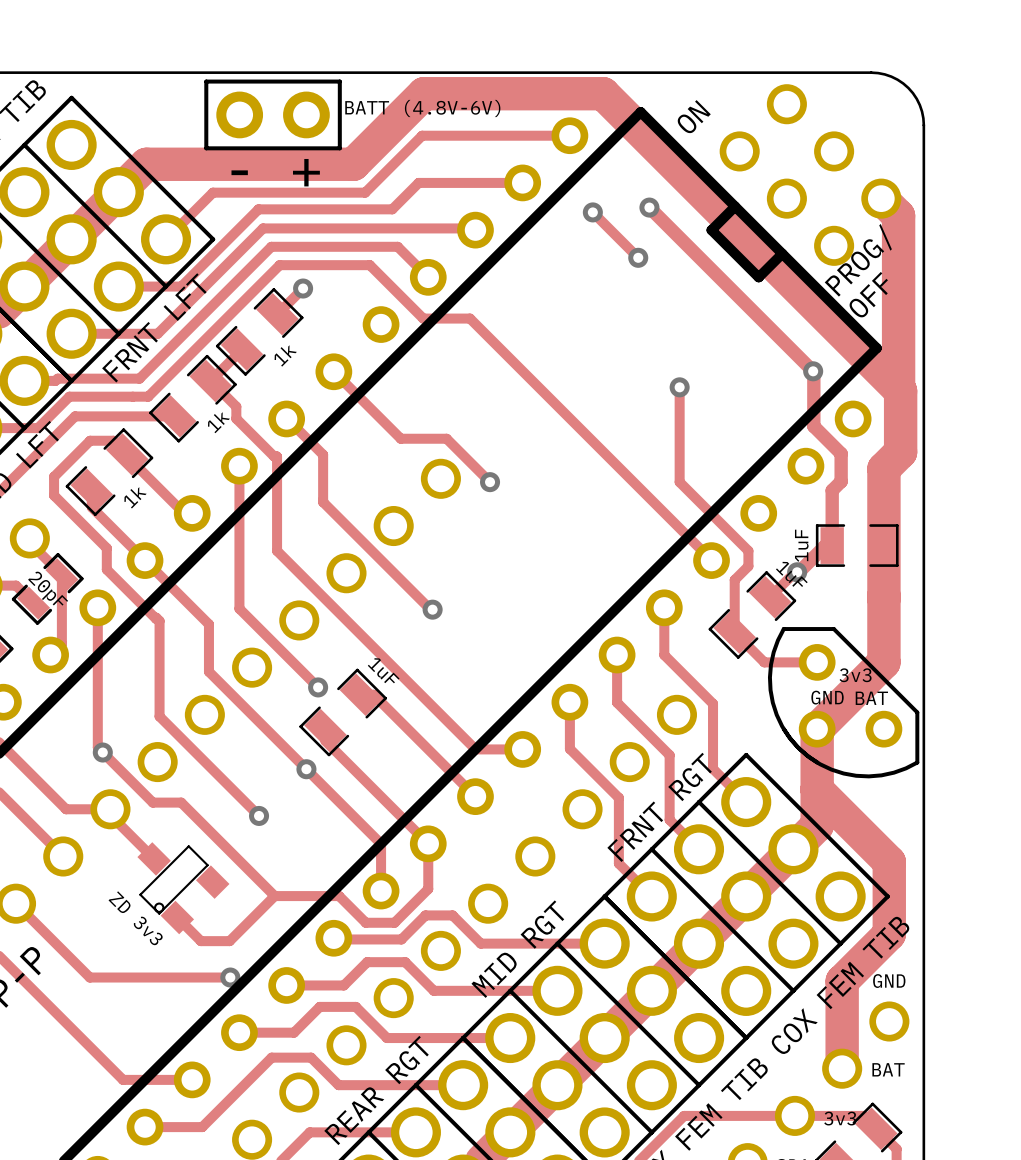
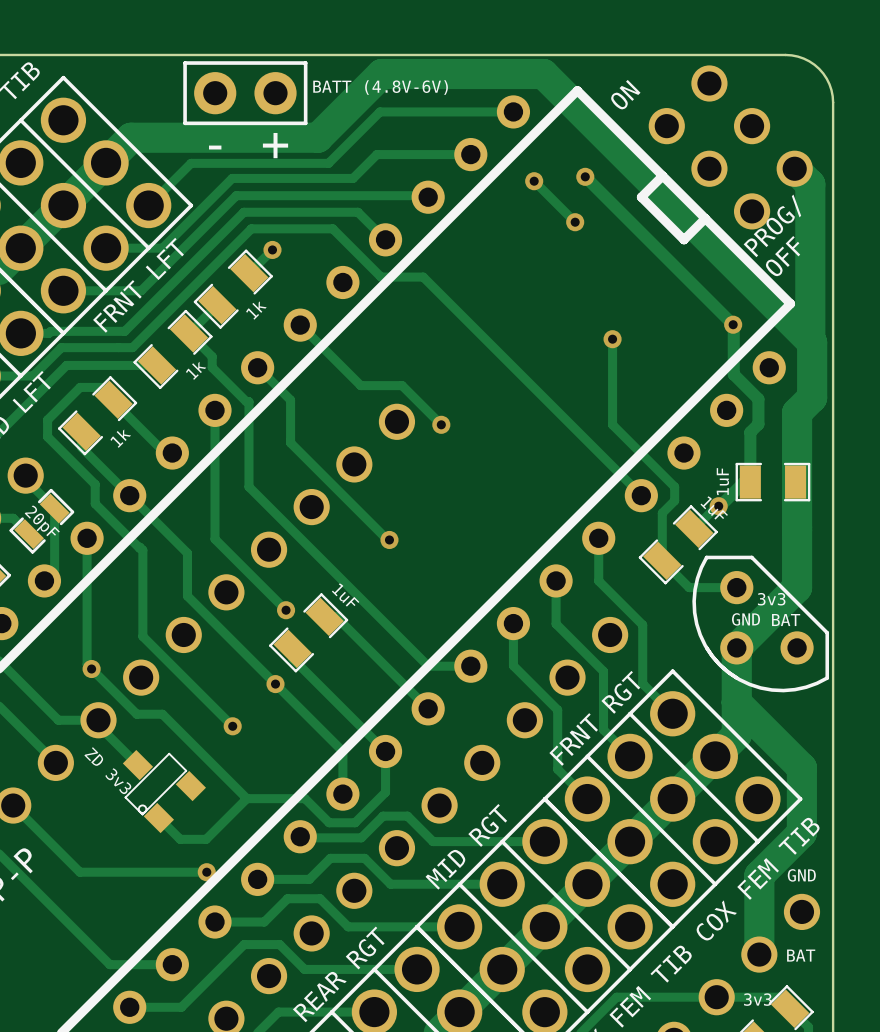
part value position: ZD 3v3 (135, 918) -> ZD 3v3 (107, 770)

